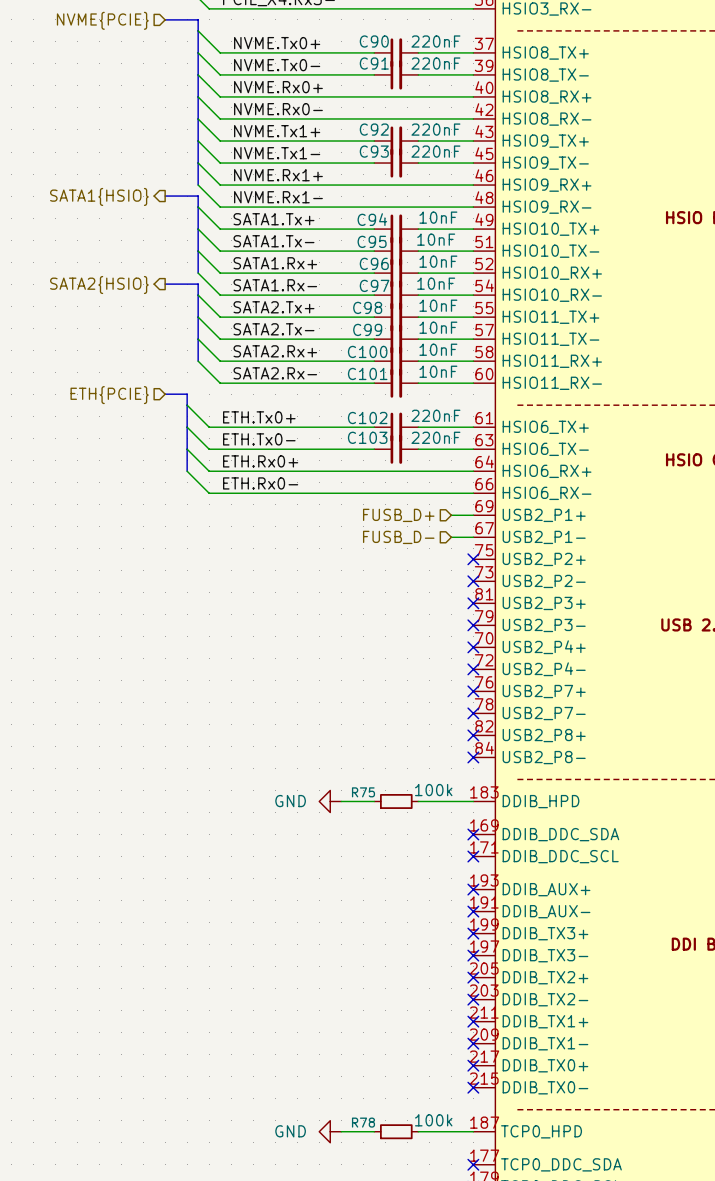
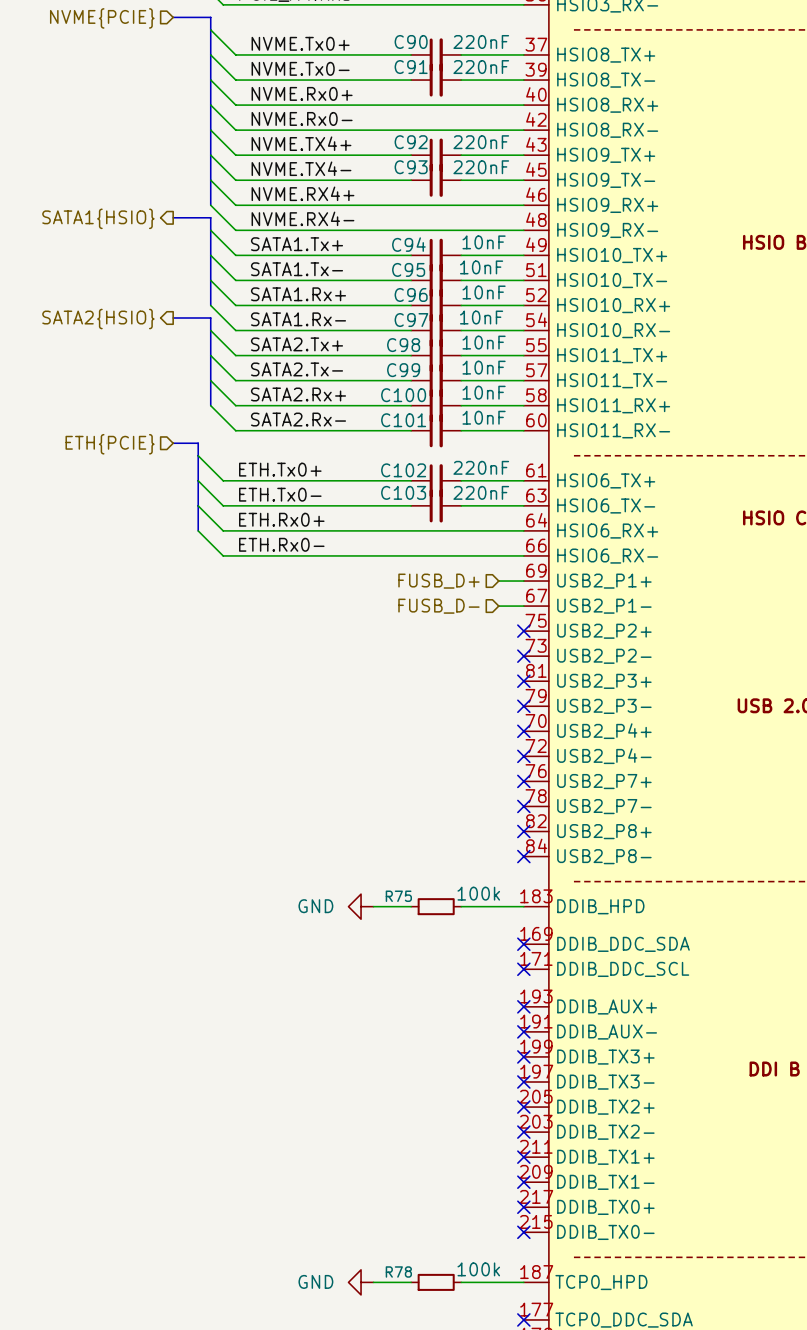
label: NVME.Tx1+ (277, 131) -> NVME.TX4+ (301, 143)
label: NVME.Tx1- (277, 153) -> NVME.TX4- (301, 168)
label: NVME.Rx1+ (278, 175) -> NVME.RX4+ (302, 193)
label: NVME.Rx1- (278, 197) -> NVME.RX4- (302, 218)

